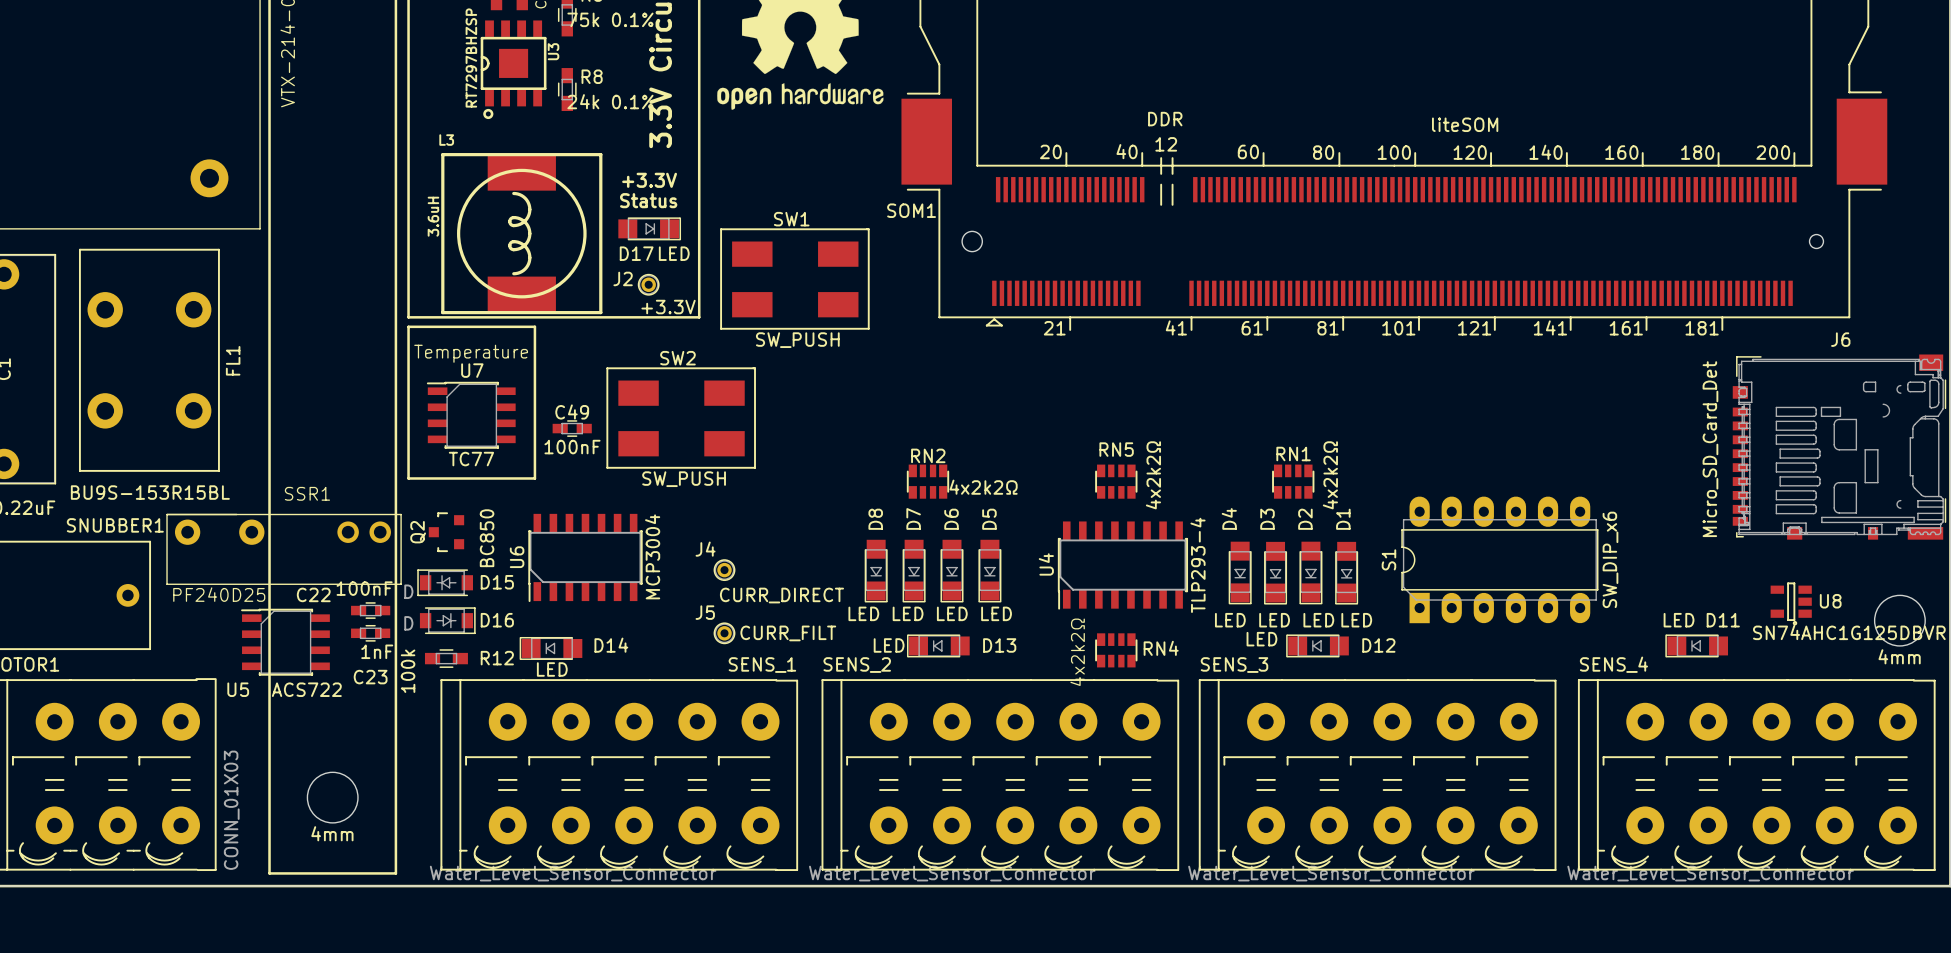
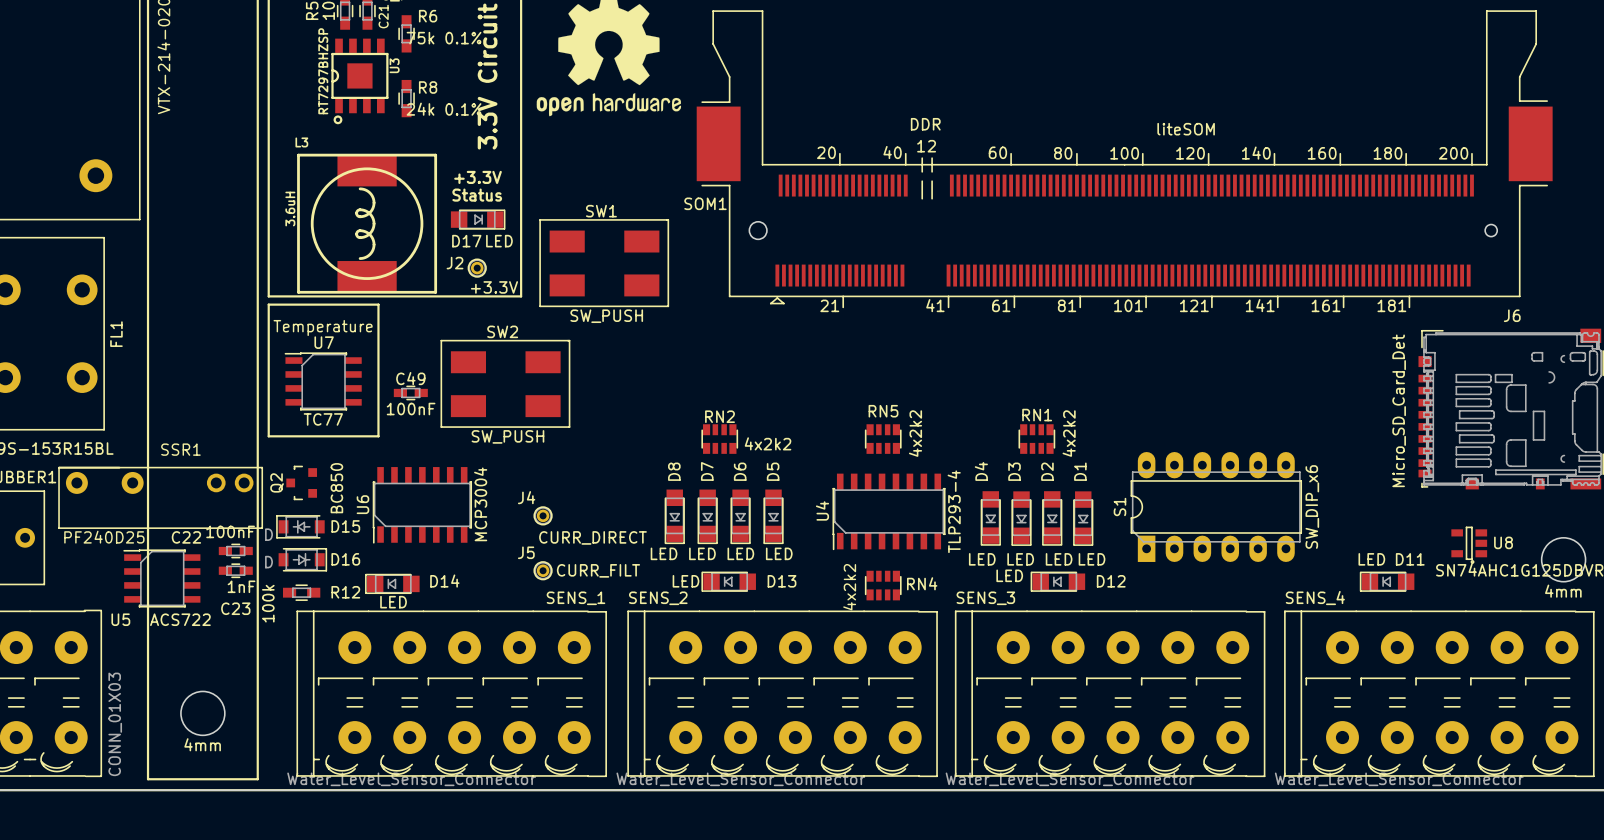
RN5 value: 4x2k2Ω (1153, 475) -> 4x2k2 (915, 433)
RN1 value: 4x2k2Ω (1330, 475) -> 4x2k2 (1069, 433)
RN2 value: 4x2k2Ω (983, 487) -> 4x2k2 (768, 443)
RN4 value: 4x2k2Ω (1077, 652) -> 4x2k2 (849, 587)

